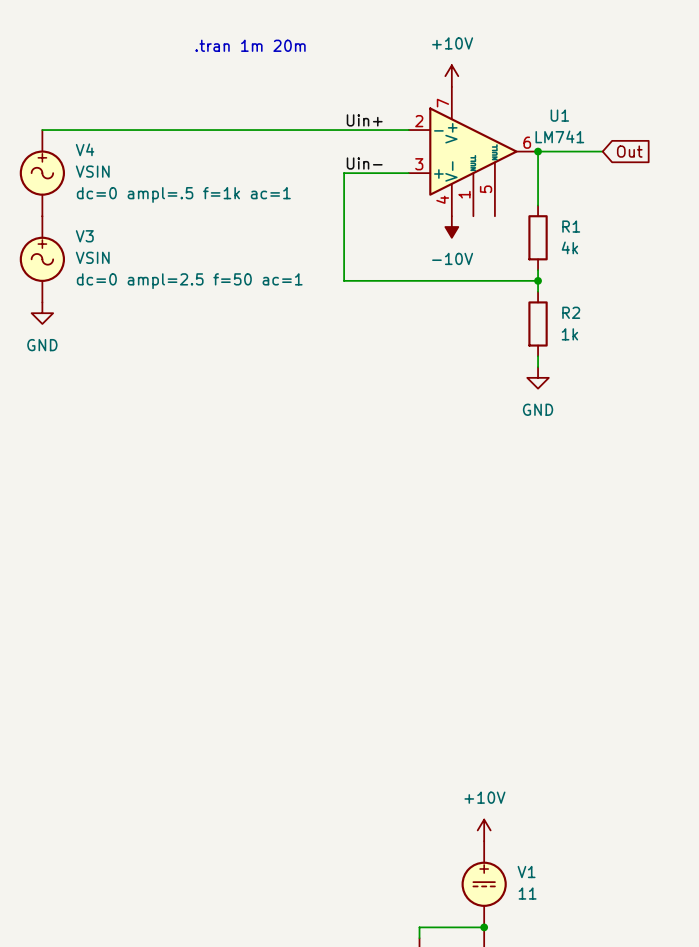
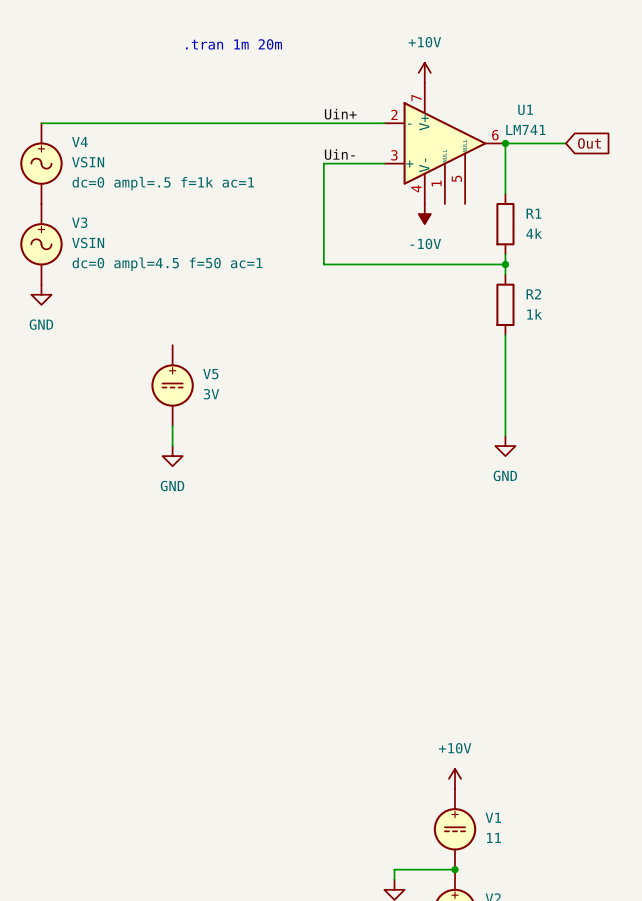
V3 text: dc=0 ampl=2.5 f=50 ac=1 (189, 281) -> dc=0 ampl=4.5 f=50 ac=1 (167, 264)
wire: none -> (505, 345) (505, 435)
power symbol position: GND (538, 377) -> GND (505, 446)
V5: none -> 3V (172, 385)
wire: none -> (172, 425) (172, 446)
power symbol: none -> GND (172, 456)

